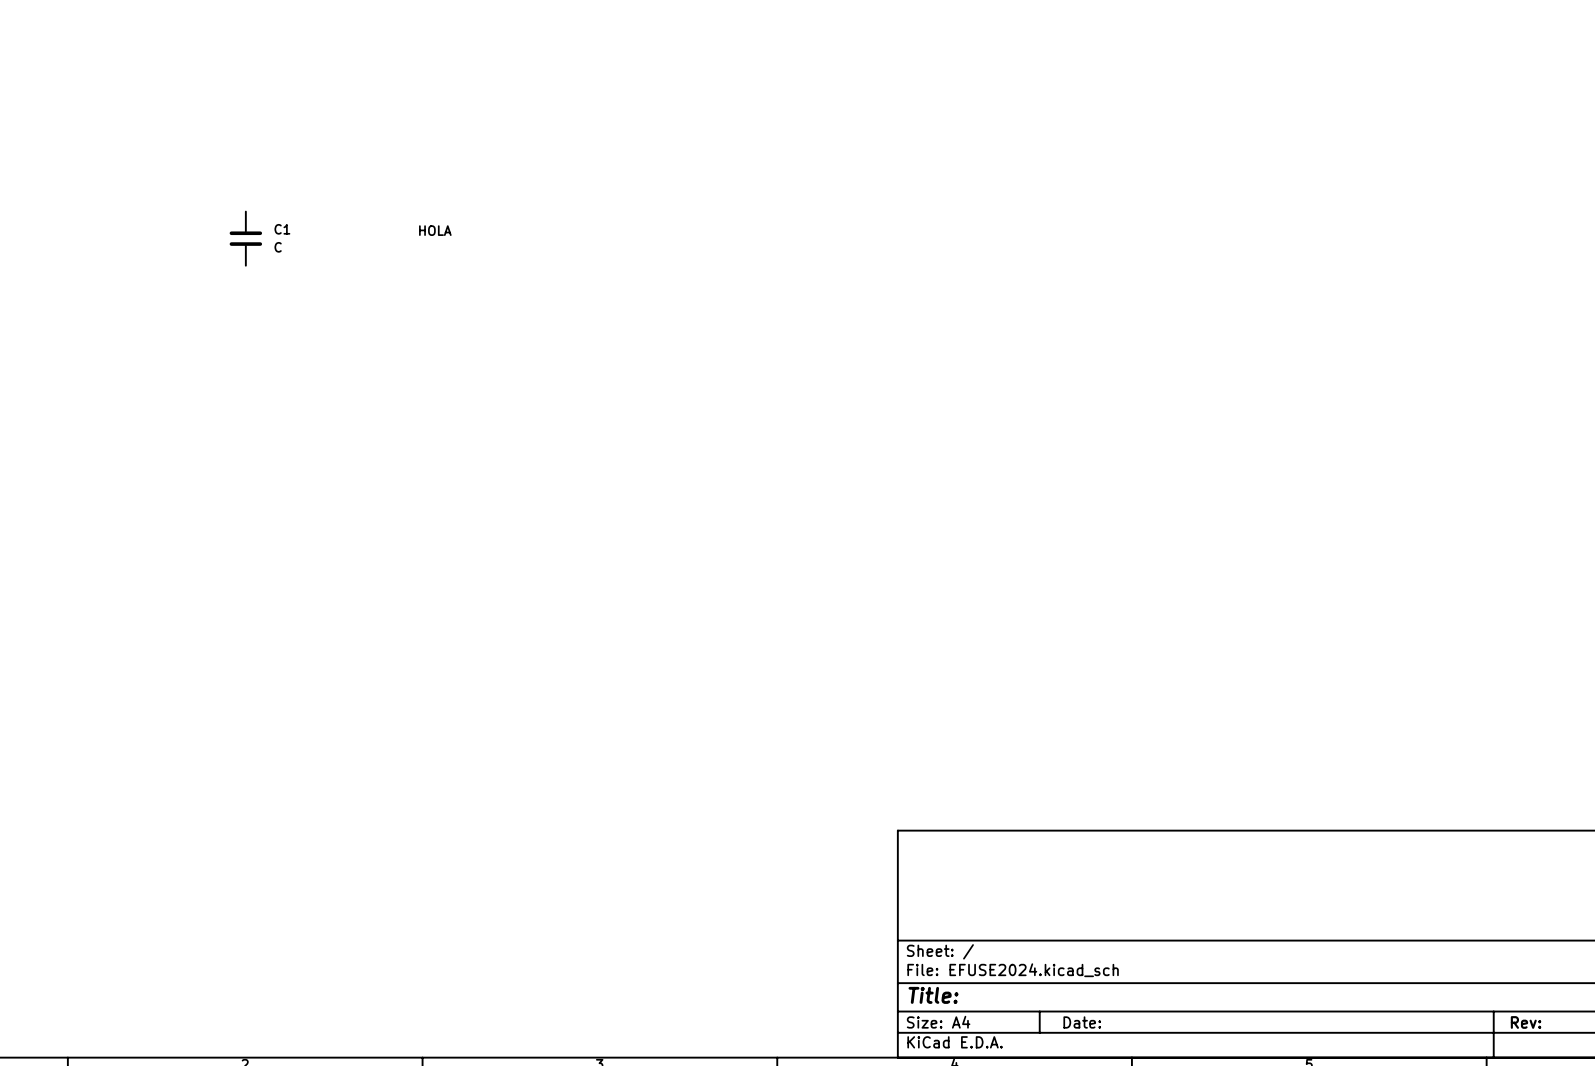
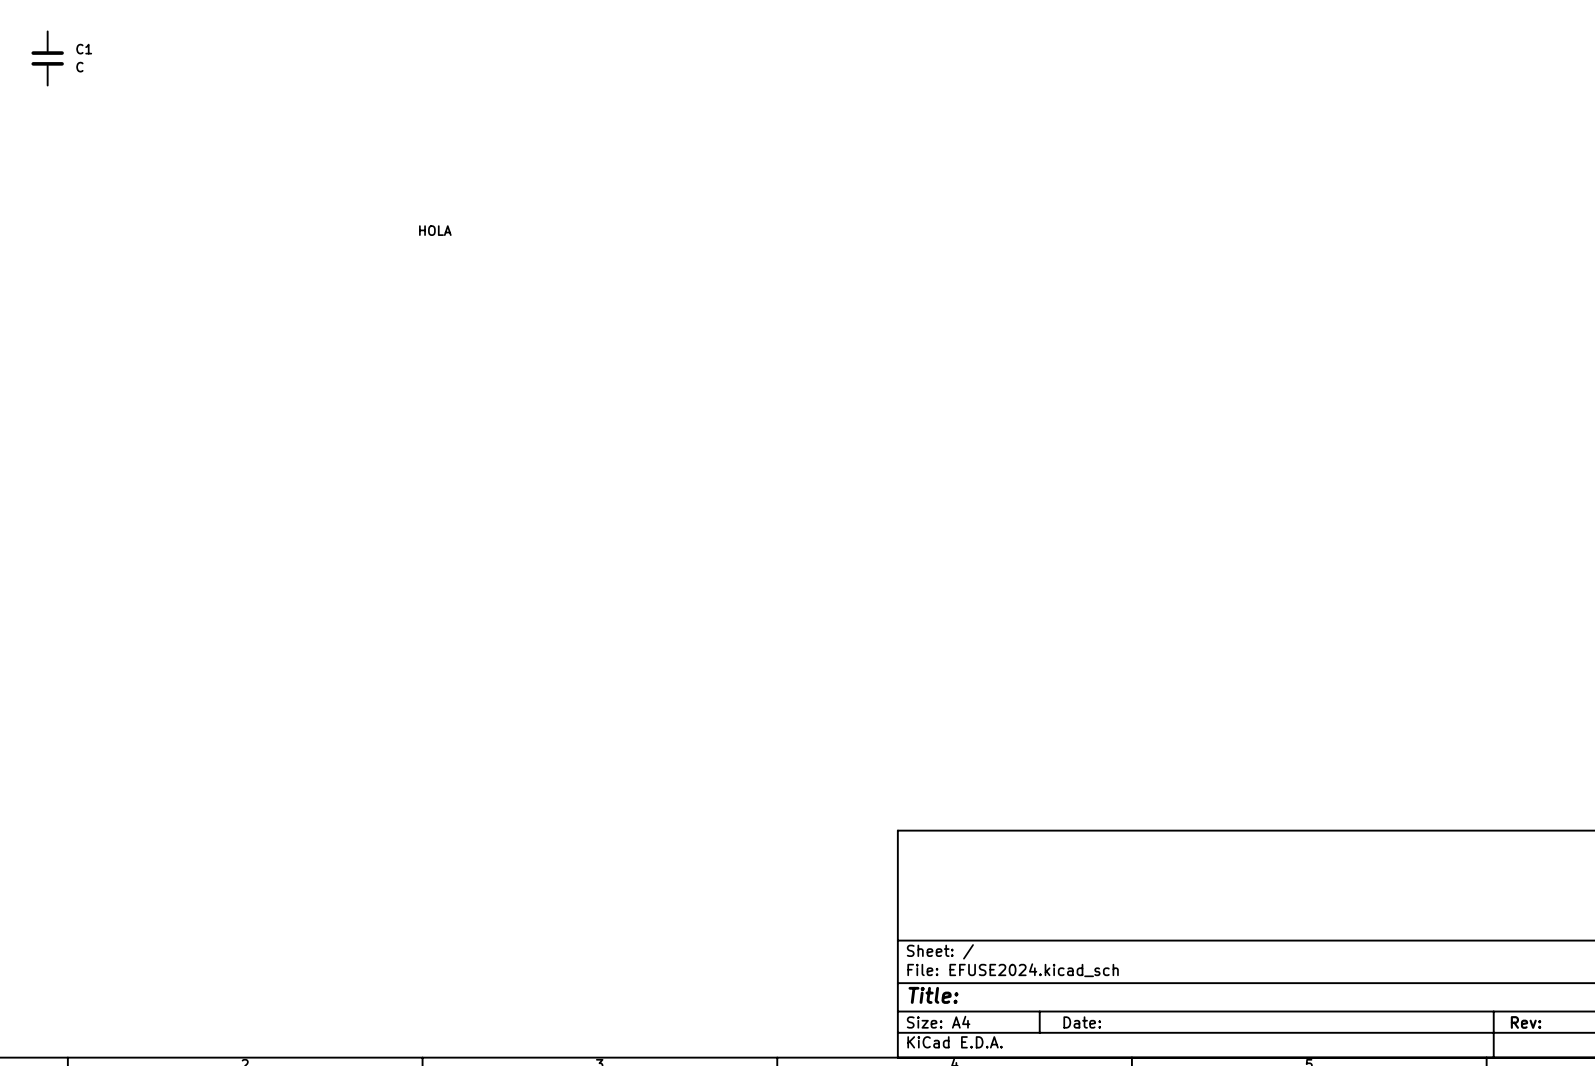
C1 position: (245, 238) -> (47, 58)

